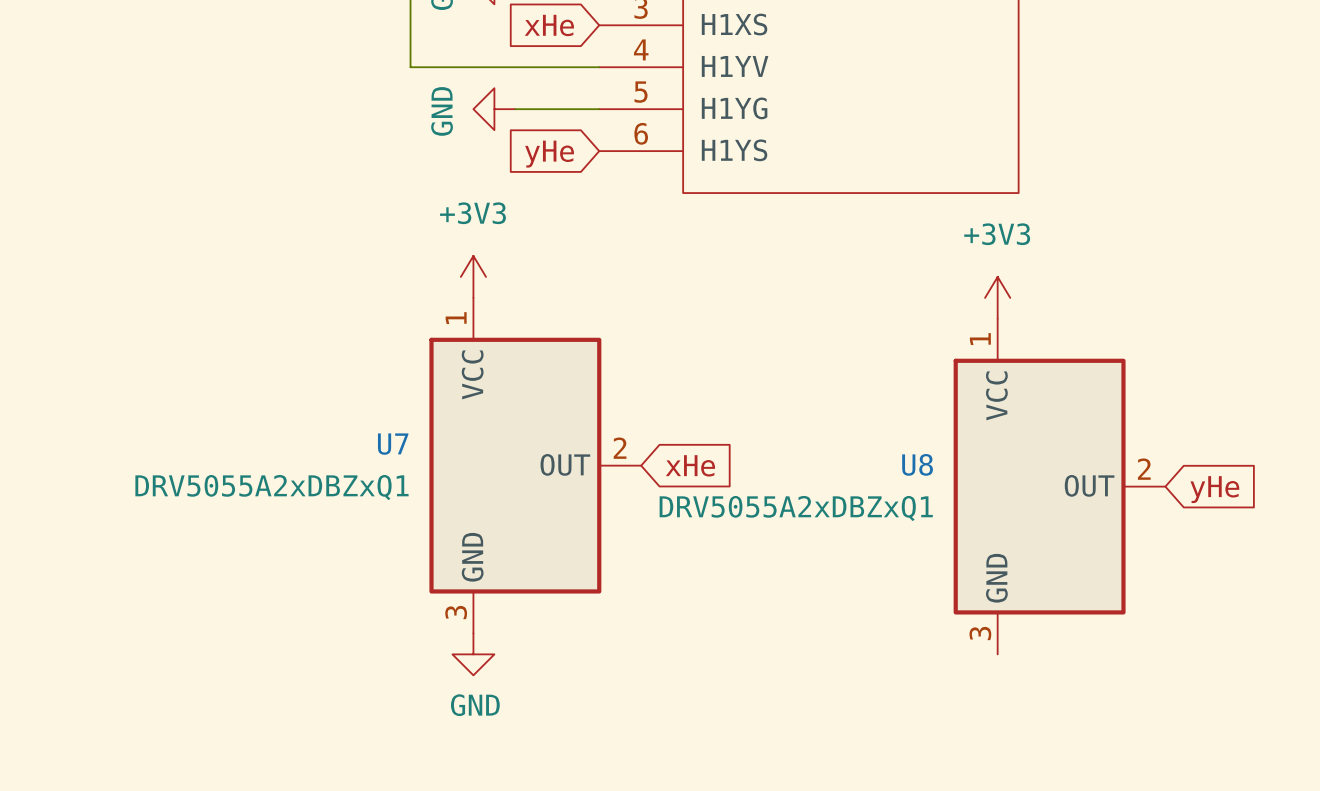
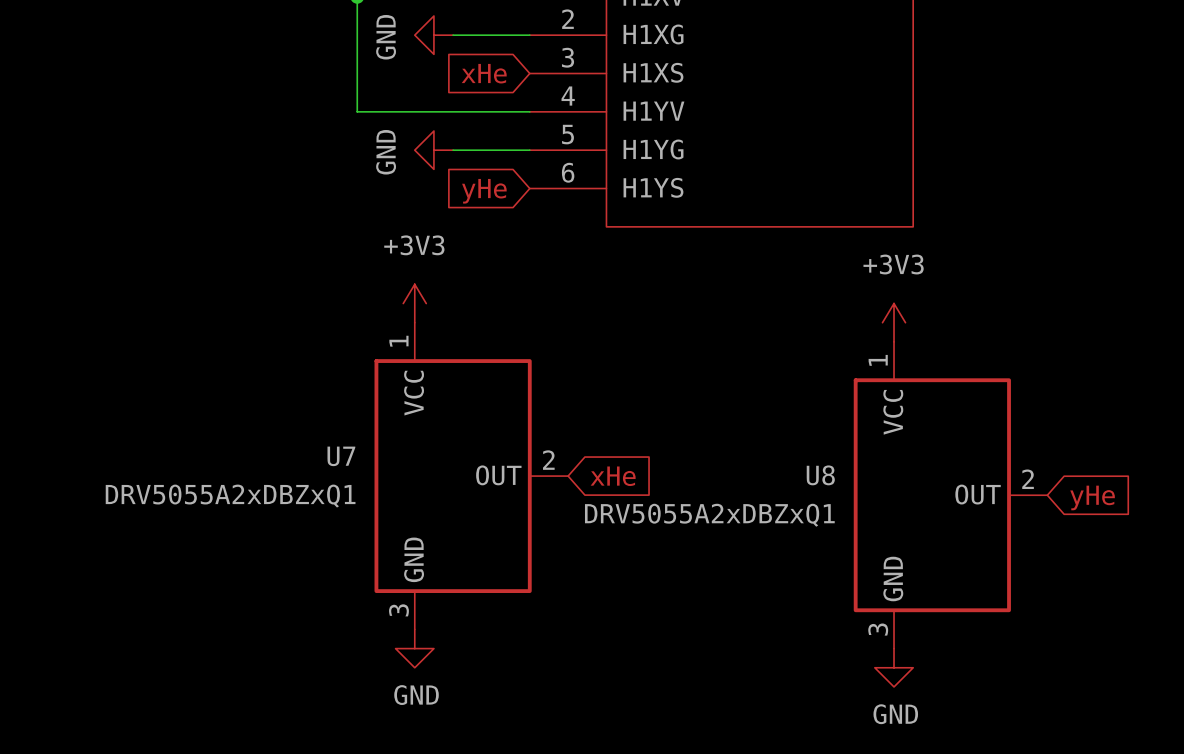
power symbol: none -> GND (894, 667)

